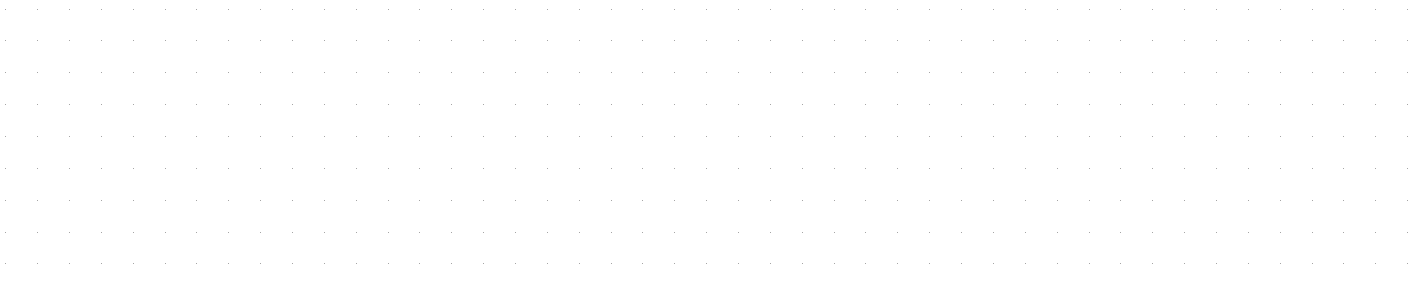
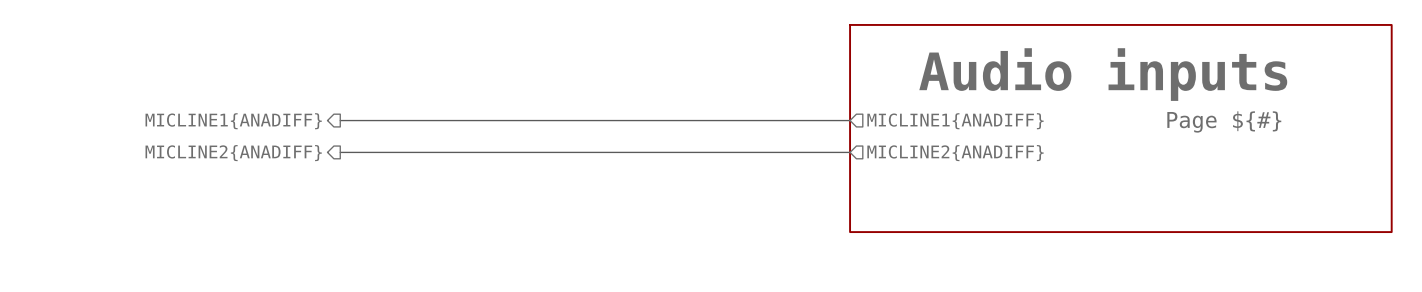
bus: none -> (340, 120) (850, 120)
sheet pin: none -> MICLINE1{ANADIFF} (233, 121)
sheet pin: none -> MICLINE1{ANADIFF} (955, 121)
sheet Audio inputs: none -> (1120, 128)
bus: none -> (340, 152) (850, 152)
sheet pin: none -> MICLINE2{ANADIFF} (233, 153)
sheet pin: none -> MICLINE2{ANADIFF} (955, 153)

